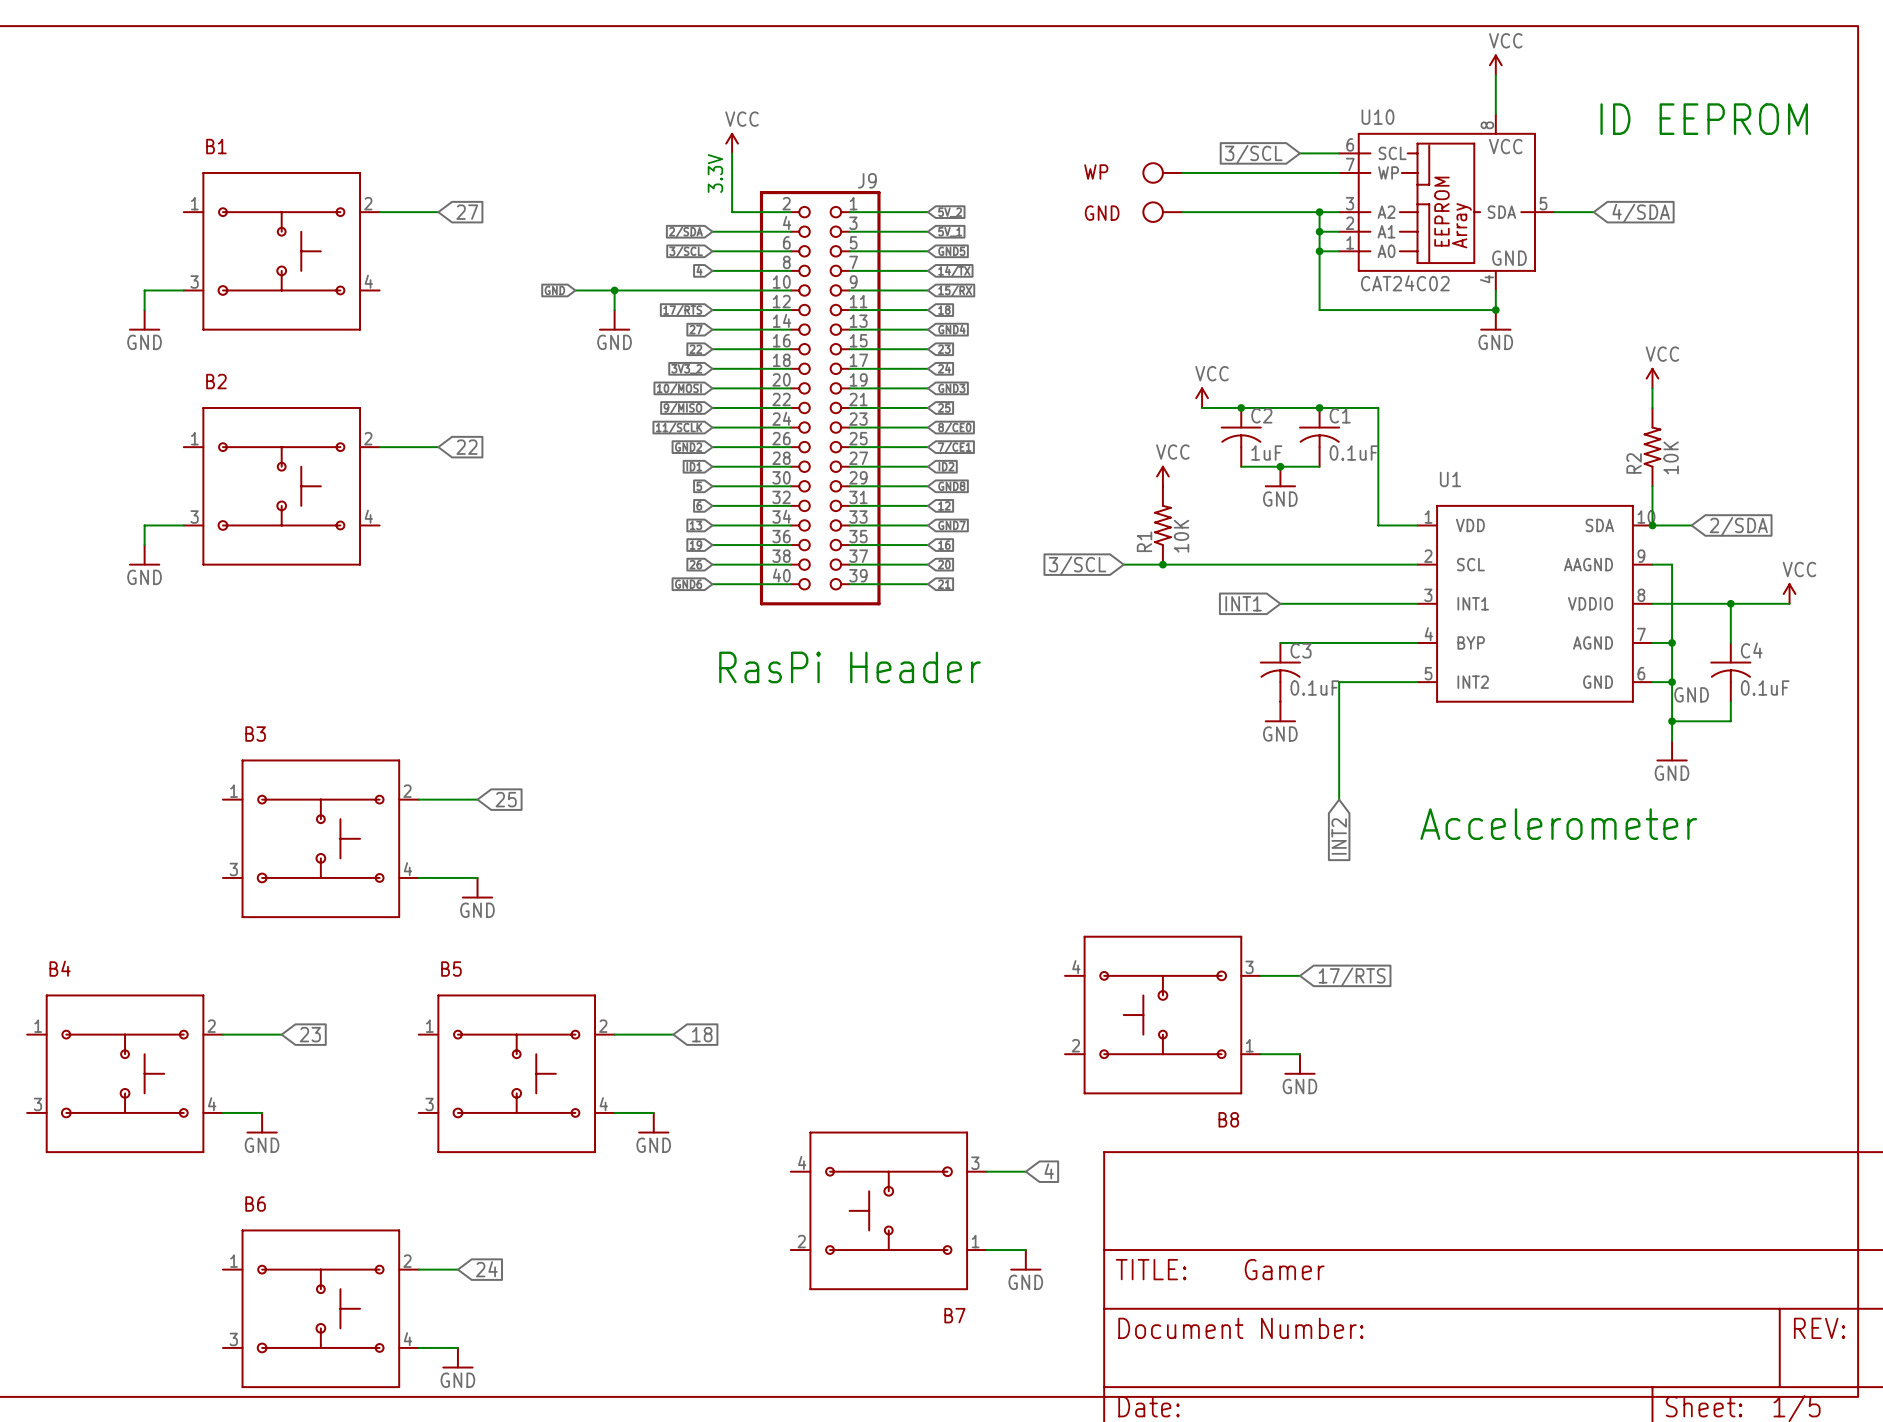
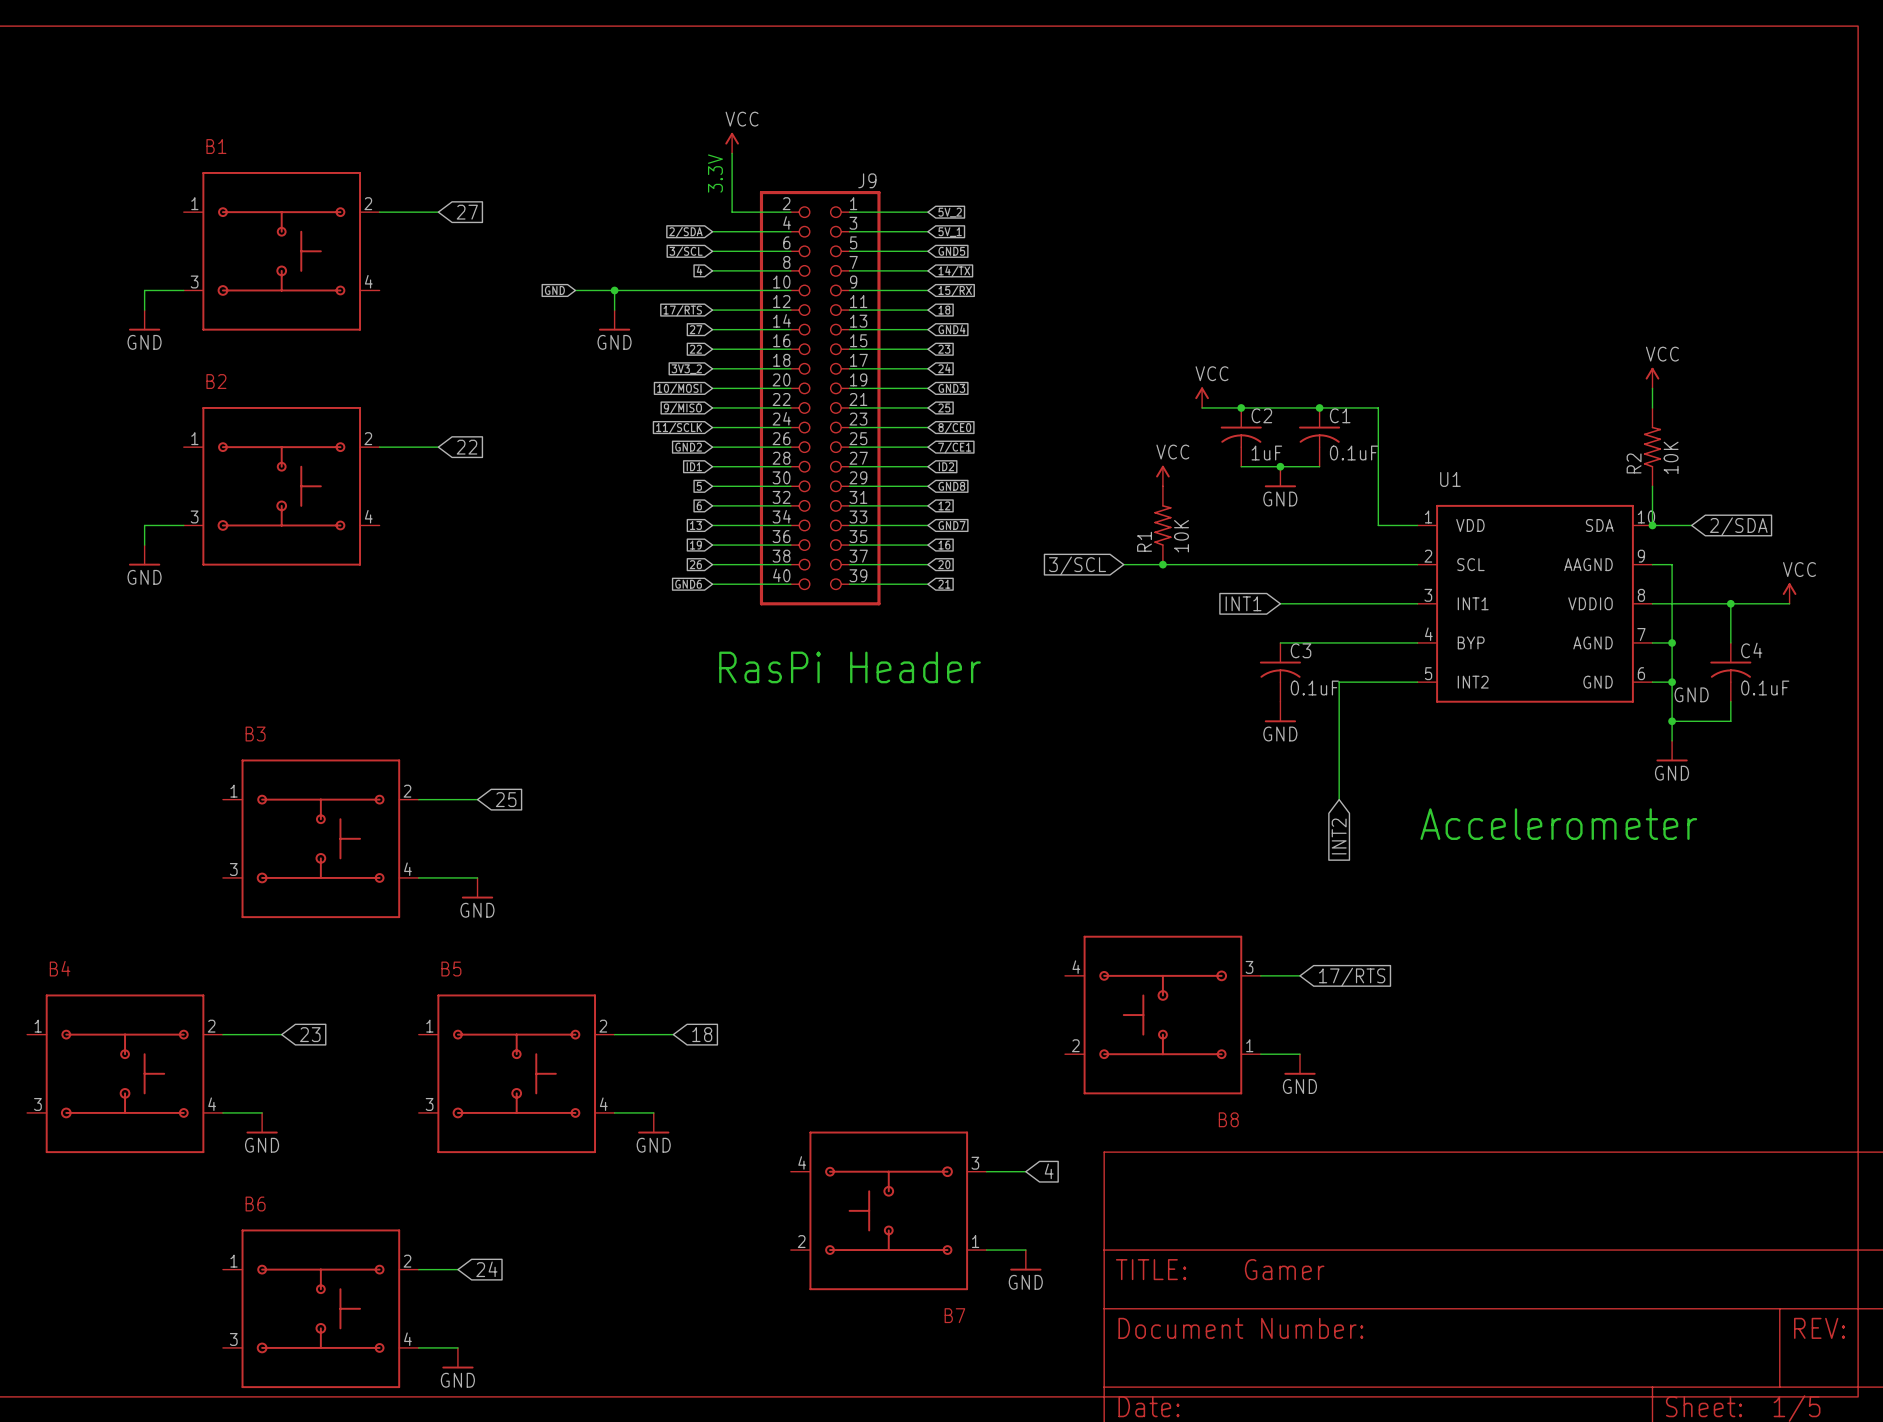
power symbol: VCC (1495, 64) -> none
wire: (1495, 75) (1495, 114) -> none
text: ID EEPROM (1704, 119) -> none
wire: (1300, 153) (1339, 153) -> none
global label: 3/SCL (1253, 154) -> none
WP: (1162, 172) -> none
wire: (1182, 172) (1339, 172) -> none
U10: CAT24C02 (1446, 202) -> none
GND: (1162, 212) -> none
wire: (1182, 212) (1339, 212) -> none
wire: (1319, 212) (1319, 310) (1495, 310) (1495, 290) -> none
junction: (1319, 212) -> none
wire: (1554, 212) (1593, 212) -> none
global label: 4/SDA (1641, 213) -> none
wire: (1319, 231) (1339, 231) -> none
junction: (1319, 231) -> none
wire: (1319, 251) (1339, 251) -> none
junction: (1319, 251) -> none
junction: (1495, 310) -> none
power symbol: GND (1495, 320) -> none

